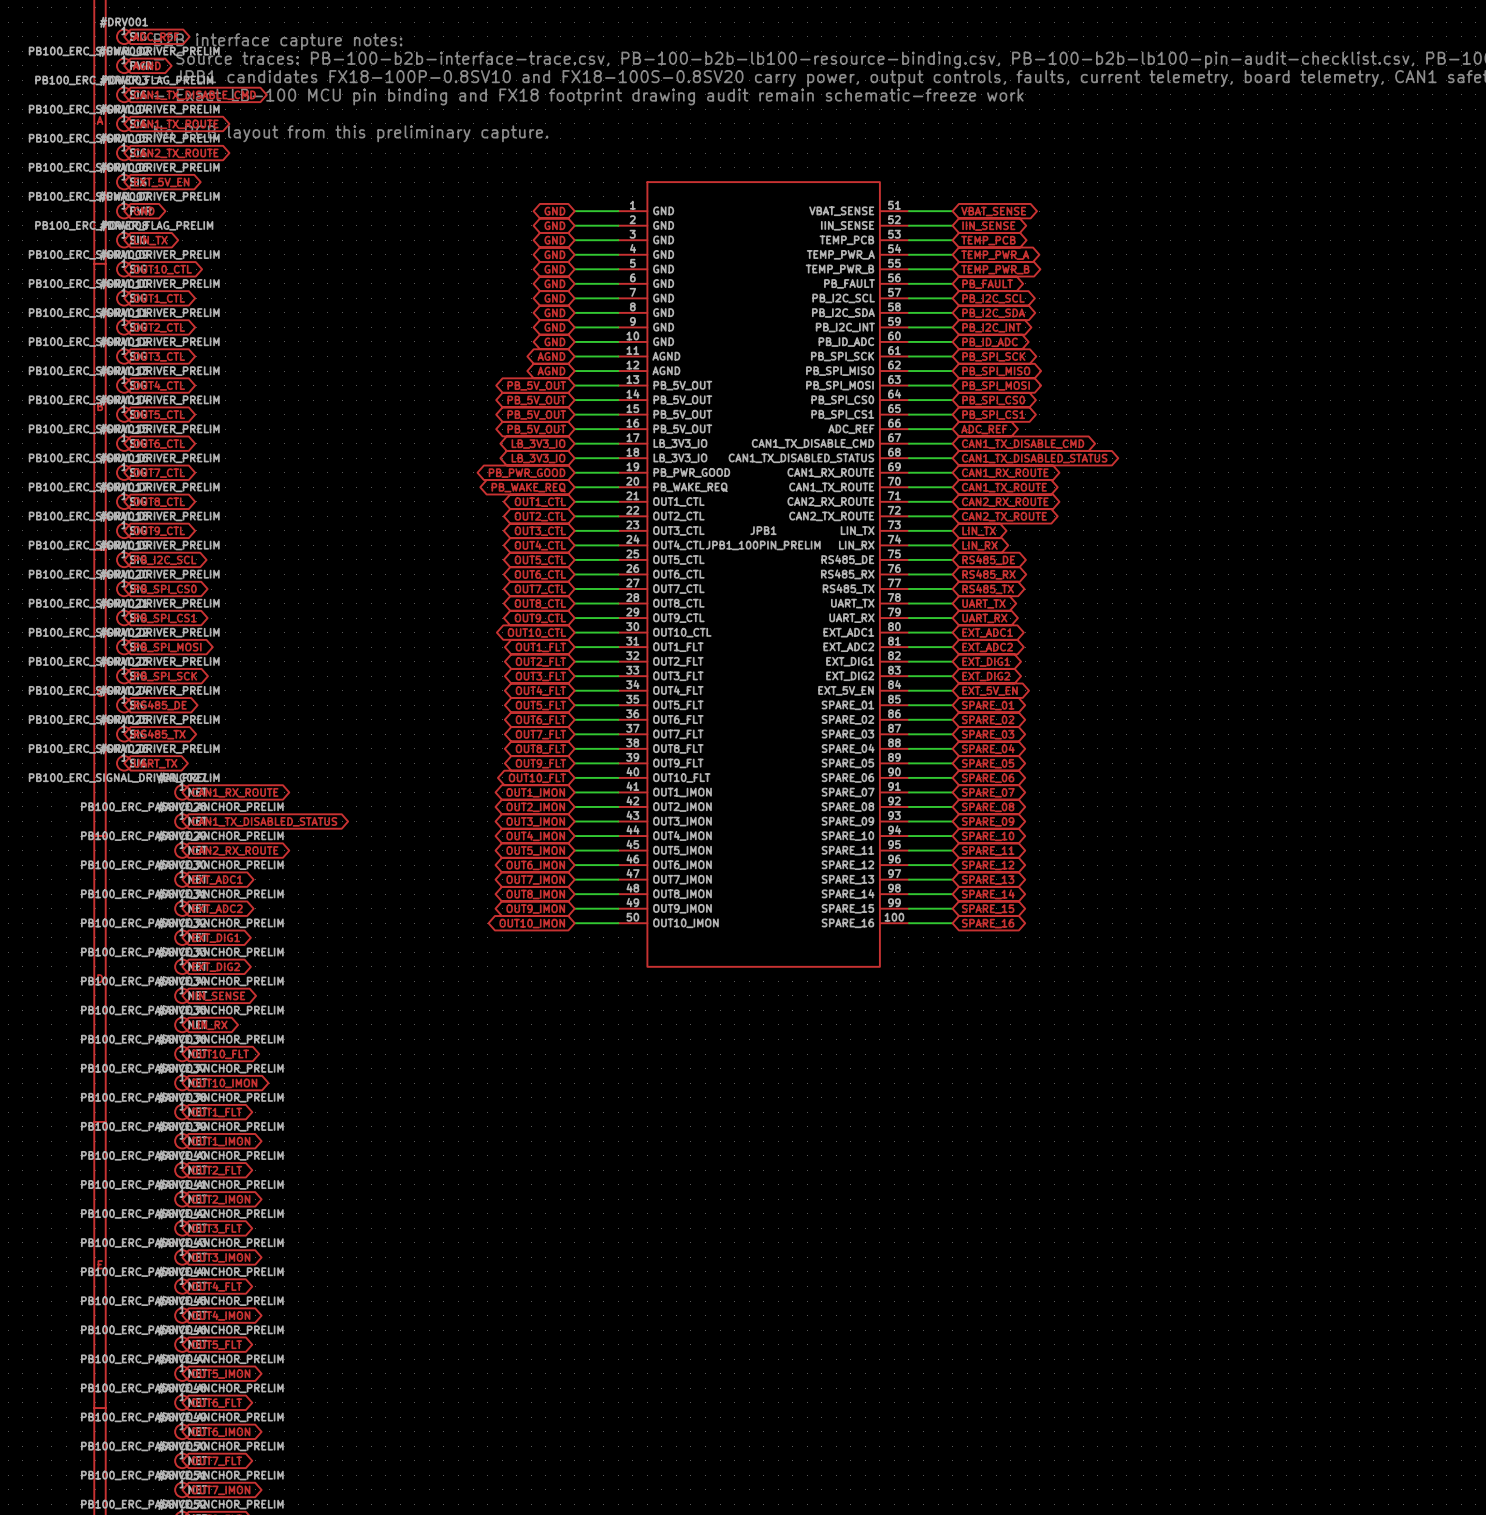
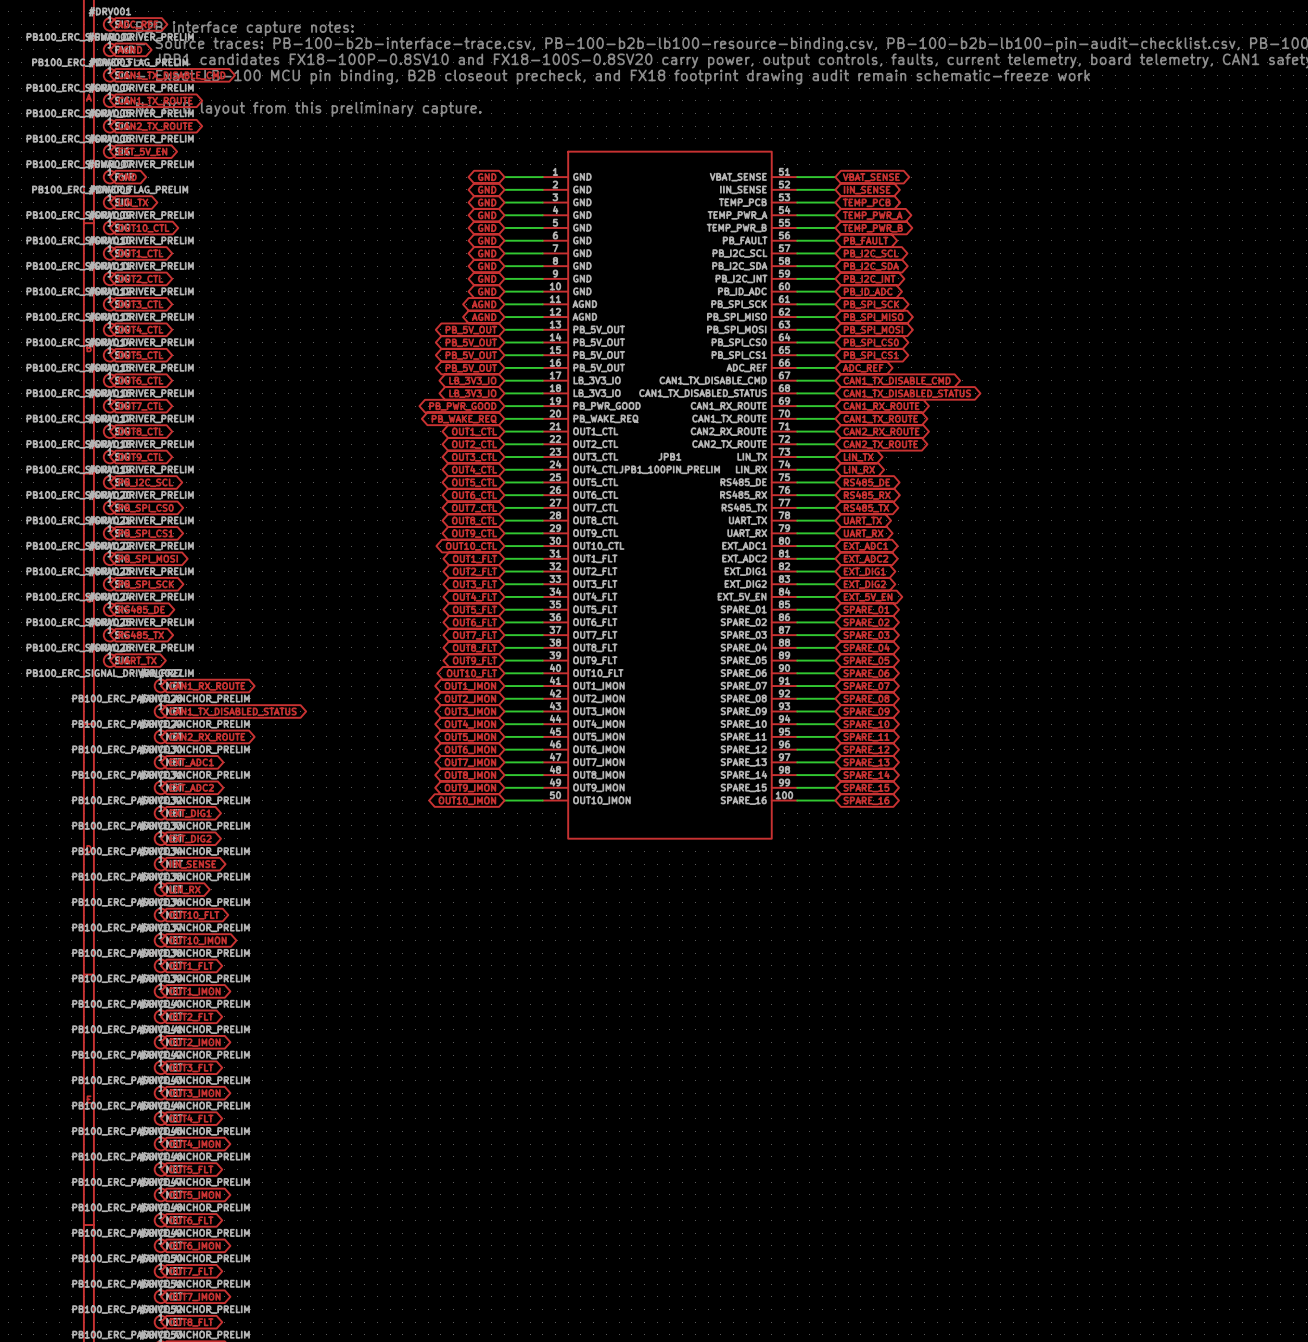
text: - Exact LB-100 MCU pin binding and FX18 footprint drawing audit remain schematic-freeze work (588, 96) -> - Exact LB-100 MCU pin binding, B2B closeout precheck, and FX18 footprint drawing audit remain schematic-freeze work (612, 77)

